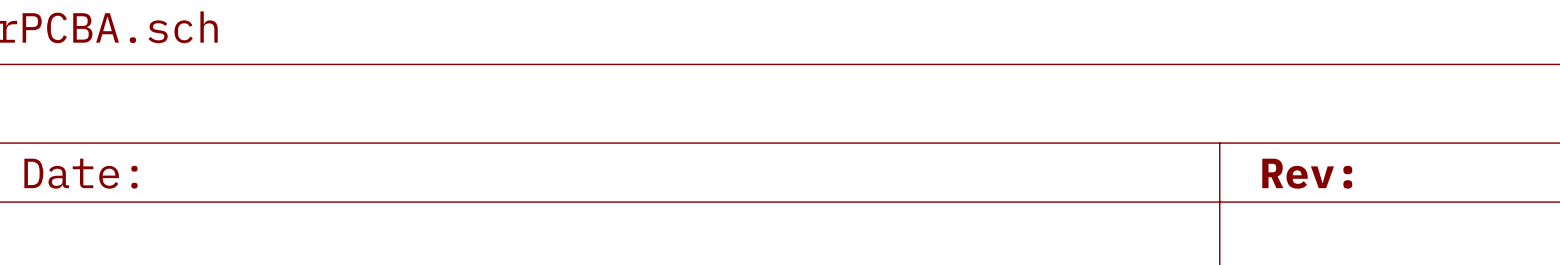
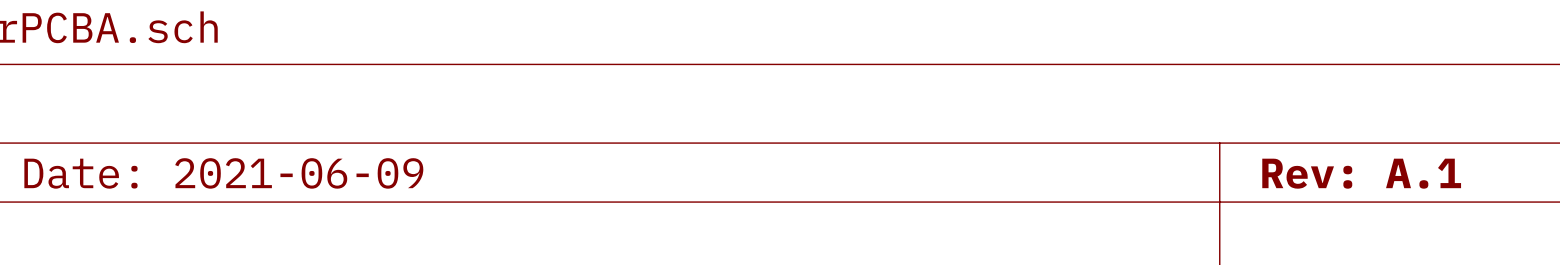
title block: Date: (80, 173) -> Date: 2021-06-09 (223, 173)
title block: Rev: (1307, 173) -> Rev: A.1 (1361, 173)

